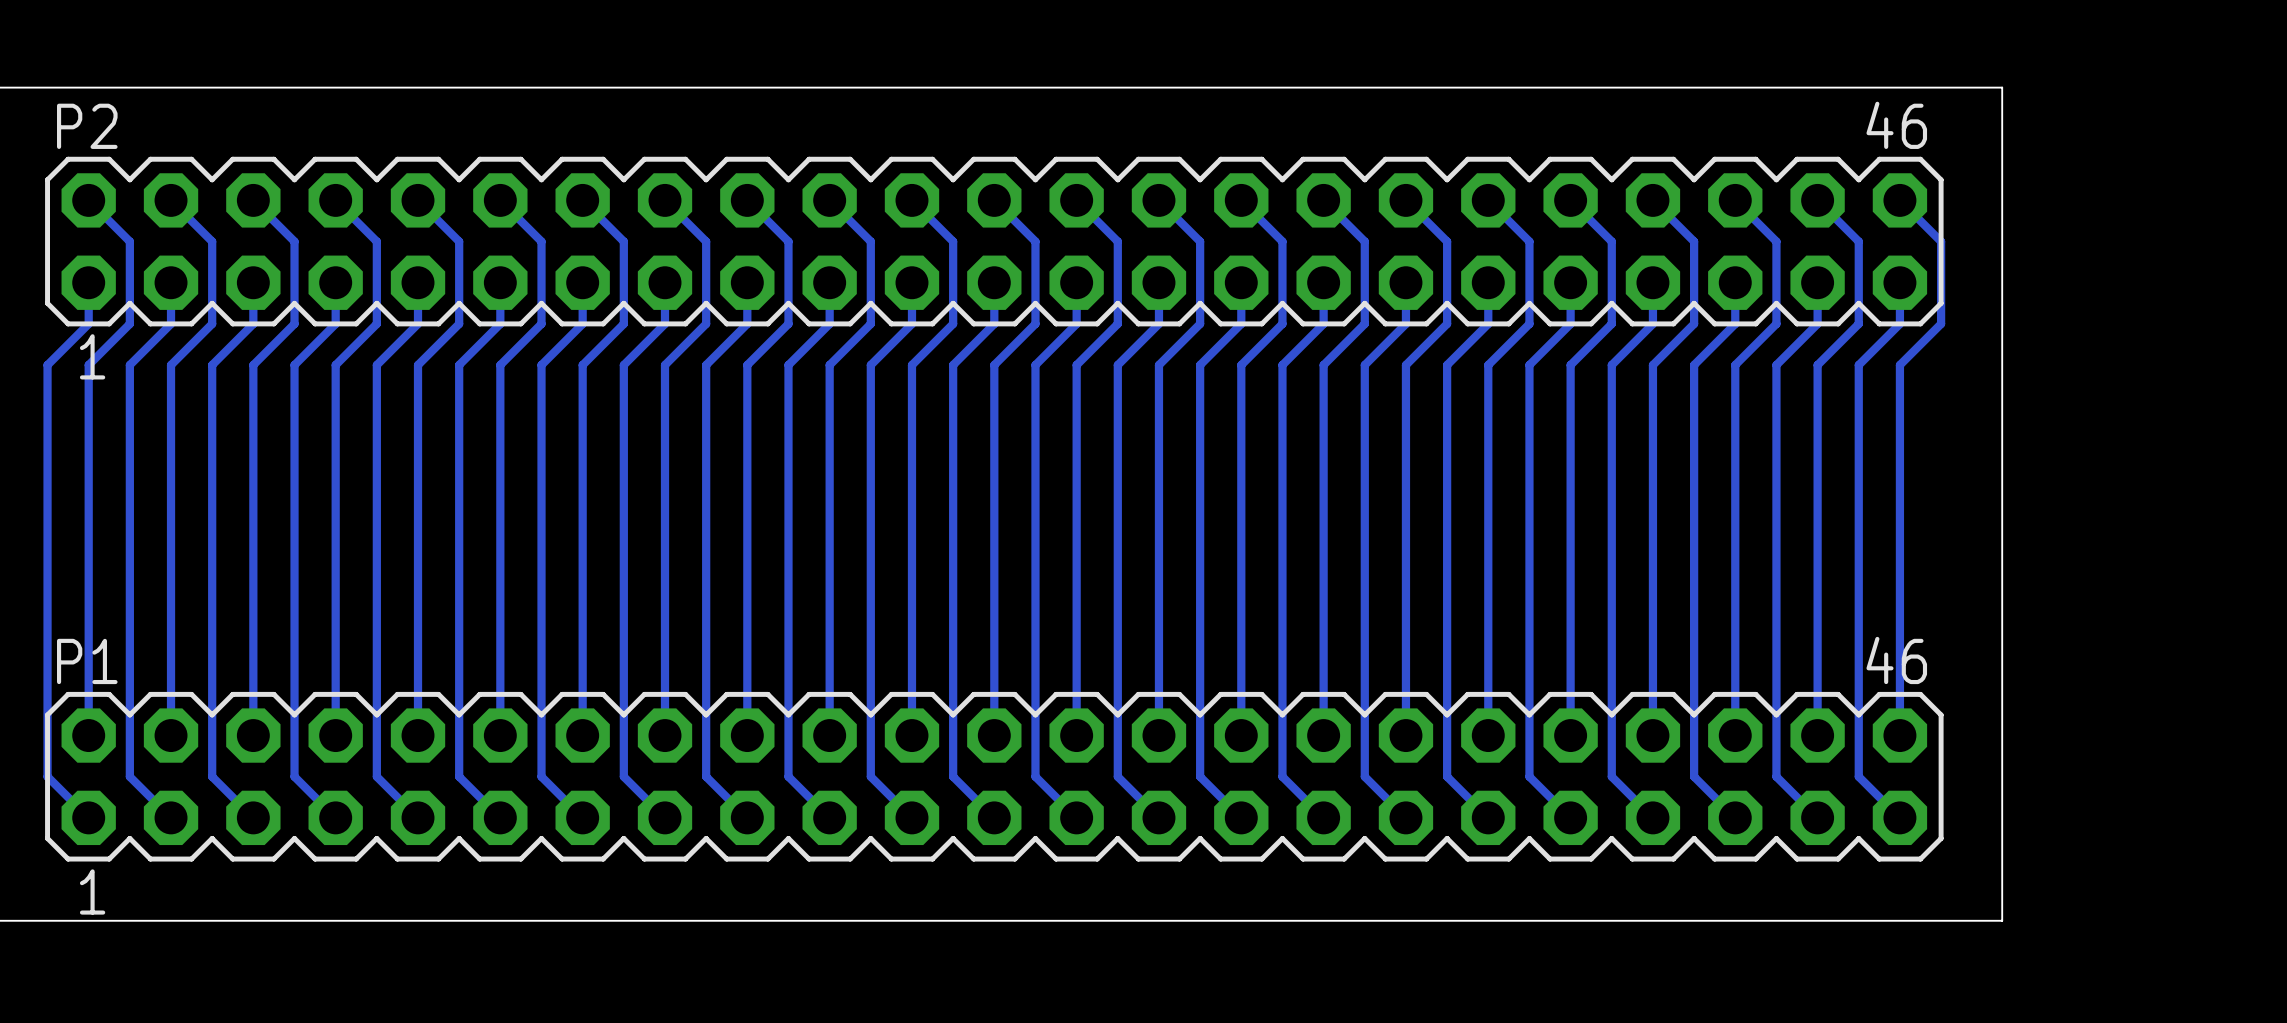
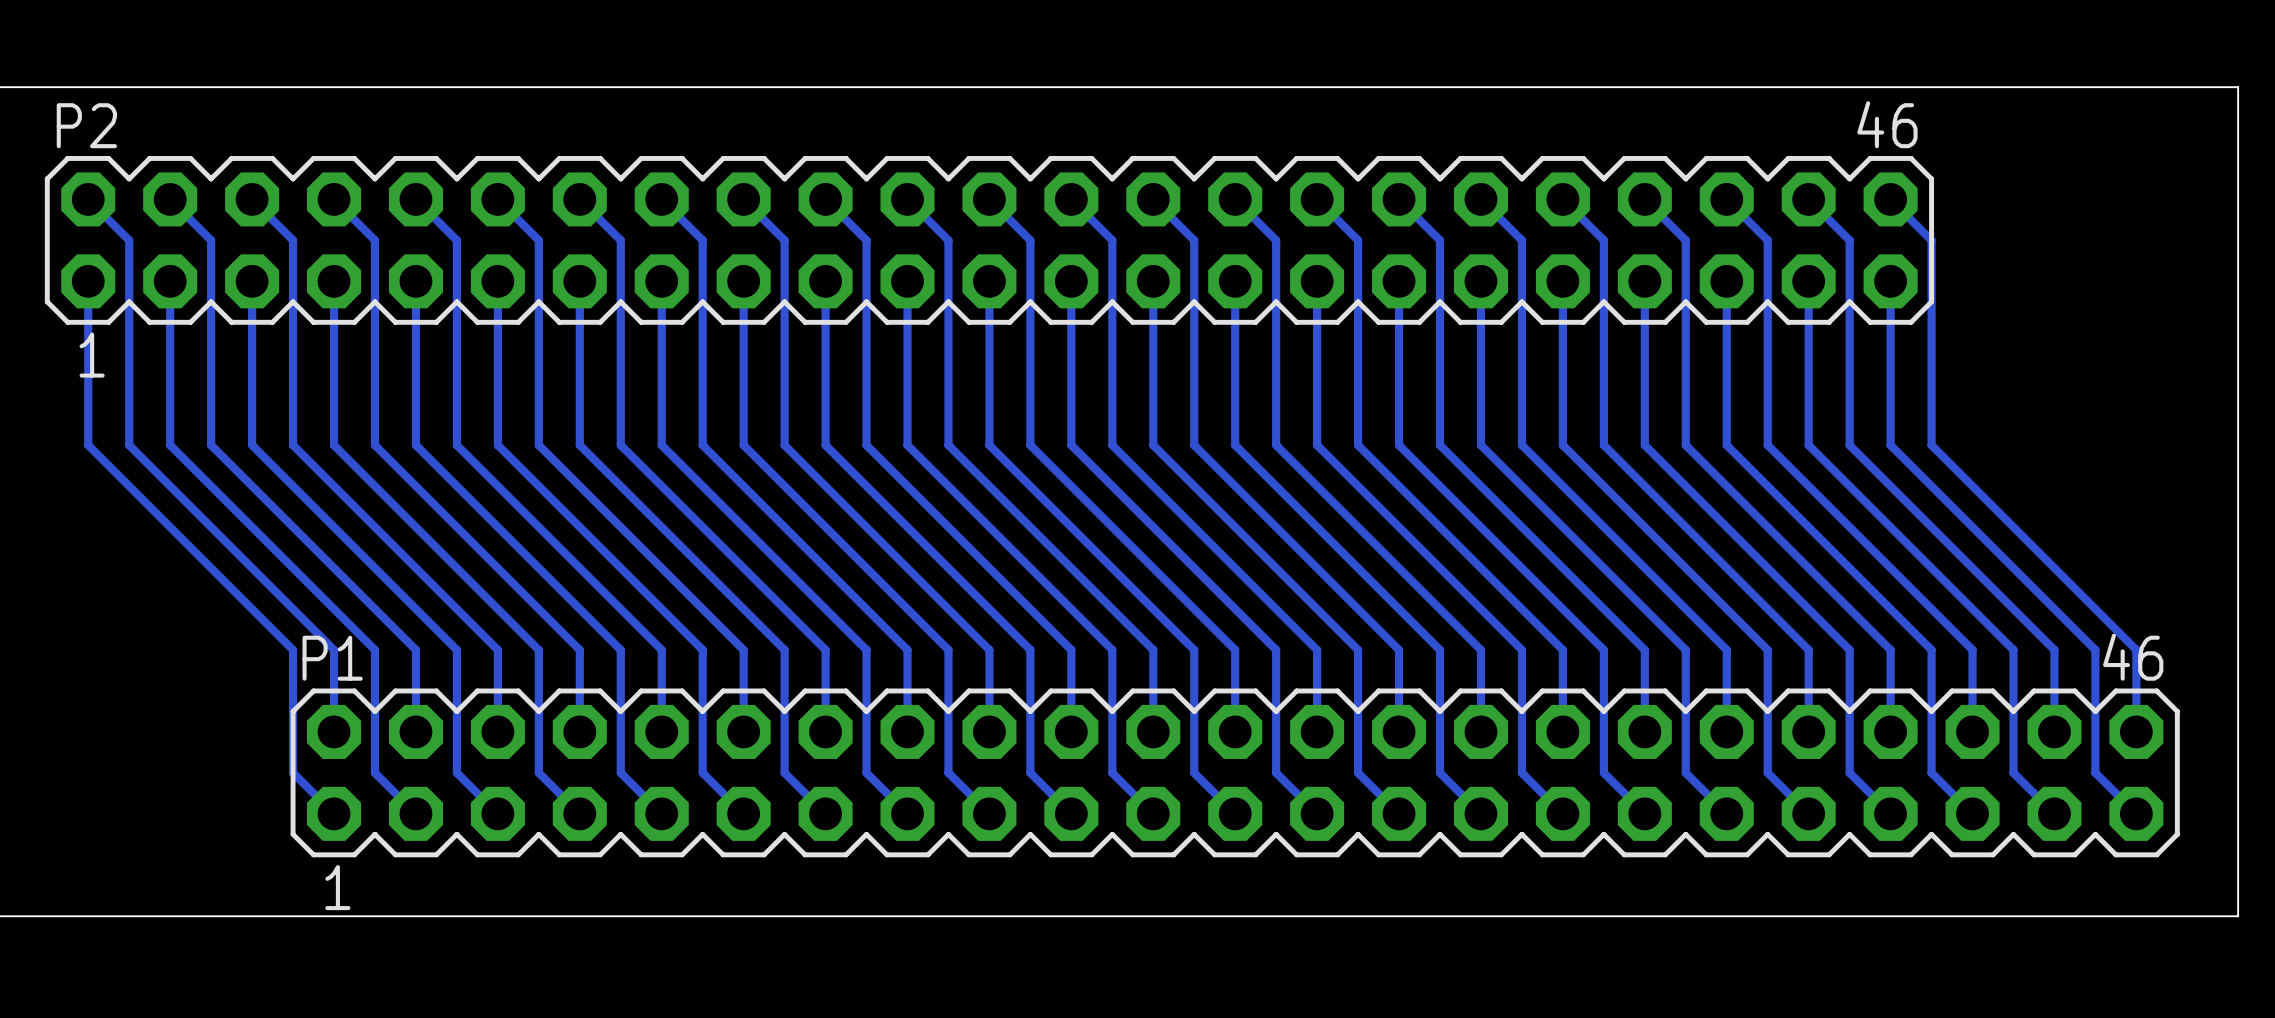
board edge: (2002, 87) (2002, 920) -> (1992, 87) (2238, 87) (2238, 916) (1992, 916)
bottom track: (88, 323) (47, 365) (47, 776) (88, 817) -> none
bottom track: (129, 323) (88, 365) -> (88, 322) (88, 363)
bottom track: (171, 323) (129, 365) -> (129, 322) (129, 363)
bottom track: (212, 323) (171, 365) -> (170, 322) (170, 363)
bottom track: (253, 323) (212, 365) -> (211, 322) (211, 363)
bottom track: (294, 323) (253, 365) -> (252, 322) (252, 363)
bottom track: (335, 323) (294, 365) -> (293, 322) (293, 363)
bottom track: (376, 323) (335, 365) -> (334, 322) (334, 363)
bottom track: (418, 323) (376, 365) -> (375, 322) (375, 363)
bottom track: (459, 323) (418, 365) -> (415, 322) (415, 363)
bottom track: (500, 323) (459, 365) -> (456, 322) (456, 363)
bottom track: (541, 323) (500, 365) -> (497, 322) (497, 363)
bottom track: (582, 323) (541, 365) -> (538, 322) (538, 363)
bottom track: (623, 323) (582, 365) -> (579, 322) (579, 363)
bottom track: (665, 323) (623, 365) -> (620, 322) (620, 363)
bottom track: (706, 323) (665, 365) -> (661, 322) (661, 363)
bottom track: (747, 323) (706, 365) -> (702, 322) (702, 363)
bottom track: (788, 323) (747, 365) -> (743, 322) (743, 363)
bottom track: (829, 323) (788, 365) -> (784, 322) (784, 363)
bottom track: (870, 323) (829, 365) -> (825, 322) (825, 363)
bottom track: (911, 323) (870, 365) -> (866, 322) (866, 363)
bottom track: (953, 323) (911, 365) -> (907, 322) (907, 363)
bottom track: (994, 323) (953, 365) -> (948, 322) (948, 363)
bottom track: (1035, 323) (994, 365) -> (989, 322) (989, 363)
bottom track: (1076, 323) (1035, 365) -> (1030, 322) (1030, 363)
bottom track: (1117, 323) (1076, 365) -> (1071, 322) (1071, 363)
bottom track: (1158, 323) (1117, 365) -> (1112, 322) (1112, 363)
bottom track: (1200, 323) (1158, 365) -> (1153, 322) (1153, 363)
bottom track: (1241, 323) (1200, 365) -> (1194, 322) (1194, 363)
bottom track: (1282, 323) (1241, 365) -> (1235, 322) (1235, 363)
bottom track: (1323, 323) (1282, 365) -> (1276, 322) (1276, 363)
bottom track: (1364, 323) (1323, 365) -> (1317, 322) (1317, 363)
bottom track: (1405, 323) (1364, 365) -> (1358, 322) (1358, 363)
bottom track: (1447, 323) (1405, 365) -> (1399, 322) (1399, 363)
bottom track: (1488, 323) (1447, 365) -> (1440, 322) (1440, 363)
bottom track: (1529, 323) (1488, 365) -> (1480, 322) (1480, 363)
bottom track: (1570, 323) (1529, 365) -> (1521, 322) (1521, 363)
bottom track: (1611, 323) (1570, 365) -> (1562, 322) (1562, 363)
bottom track: (1652, 323) (1611, 365) -> (1603, 322) (1603, 363)
bottom track: (1694, 323) (1652, 365) -> (1644, 322) (1644, 363)
bottom track: (1735, 323) (1694, 365) -> (1685, 322) (1685, 363)
bottom track: (1776, 323) (1735, 365) -> (1726, 322) (1726, 363)
bottom track: (1817, 323) (1776, 365) -> (1767, 322) (1767, 363)
bottom track: (1858, 323) (1817, 365) -> (1808, 322) (1808, 363)
bottom track: (1899, 323) (1858, 365) -> (1849, 322) (1849, 363)
bottom track: (1941, 323) (1899, 365) -> (1890, 322) (1890, 363)
bottom track: none -> (1931, 322) (1931, 445) (2136, 650) (2136, 731)
bottom track: (88, 447) (88, 735) -> (88, 445) (293, 650)
bottom track: (129, 447) (129, 776) (171, 817) -> (129, 445) (334, 650) (334, 731)
bottom track: (171, 447) (171, 735) -> none
bottom track: (212, 447) (212, 776) (253, 817) -> (211, 445) (415, 650)
bottom track: (253, 447) (253, 735) -> (252, 445) (456, 650)
bottom track: (294, 447) (294, 653) -> (293, 445) (497, 650)
bottom track: (335, 447) (335, 735) -> none
bottom track: (376, 447) (376, 776) -> (170, 445) (375, 650) (375, 772)
bottom track: (418, 447) (418, 653) -> (415, 445) (620, 650)
bottom track: (459, 447) (459, 653) -> (456, 445) (661, 650)
bottom track: (500, 447) (500, 653) -> (497, 445) (702, 650)
bottom track: (541, 447) (541, 653) -> (334, 445) (538, 650)
bottom track: none -> (538, 445) (743, 650)
bottom track: (582, 447) (582, 653) -> (375, 445) (579, 650)
bottom track: none -> (579, 445) (784, 650)
bottom track: (623, 447) (623, 653) -> (620, 445) (825, 650)
bottom track: (665, 447) (665, 653) -> (661, 445) (866, 650)
bottom track: (706, 447) (706, 653) -> (702, 445) (907, 650)
bottom track: (747, 447) (747, 653) -> (743, 445) (948, 650)
bottom track: (788, 447) (788, 653) -> (784, 445) (989, 650)
bottom track: (829, 447) (829, 653) -> (825, 445) (1030, 650)
bottom track: (870, 447) (870, 653) -> (866, 445) (1071, 650)
bottom track: (911, 447) (911, 653) -> (907, 445) (1112, 650)
bottom track: (953, 447) (953, 653) -> (948, 445) (1153, 650)
bottom track: (994, 447) (994, 653) -> (989, 445) (1194, 650)
bottom track: (1035, 447) (1035, 653) -> (1030, 445) (1235, 650)
bottom track: (1076, 447) (1076, 653) -> (1071, 445) (1276, 650)
bottom track: (1117, 447) (1117, 653) -> (1112, 445) (1317, 650)
bottom track: (1158, 447) (1158, 653) -> (1153, 445) (1358, 650)
bottom track: (1200, 447) (1200, 653) -> (1194, 445) (1399, 650)
bottom track: (1241, 447) (1241, 653) -> (1235, 445) (1440, 650)
bottom track: (1282, 447) (1282, 653) -> (1276, 445) (1480, 650)
bottom track: (1323, 447) (1323, 653) -> (1317, 445) (1521, 650)
bottom track: (1364, 447) (1364, 653) -> (1358, 445) (1562, 650)
bottom track: (1405, 447) (1405, 653) -> (1399, 445) (1603, 650)
bottom track: (1447, 447) (1447, 653) -> (1440, 445) (1644, 650)
bottom track: (1488, 447) (1488, 653) -> (1480, 445) (1685, 650)
bottom track: (1529, 447) (1529, 653) -> (1521, 445) (1726, 650)
bottom track: (1570, 447) (1570, 653) -> (1562, 445) (1767, 650)
bottom track: (1611, 447) (1611, 653) -> (1603, 445) (1808, 650)
bottom track: (1652, 447) (1652, 653) -> (1644, 445) (1849, 650)
bottom track: (1694, 447) (1694, 653) -> (1685, 445) (1890, 650)
bottom track: (1735, 447) (1735, 653) -> (1726, 445) (1931, 650) (1931, 772) (1972, 813)
bottom track: (1776, 447) (1776, 653) -> (1767, 445) (1972, 650) (1972, 731)
bottom track: (1817, 447) (1817, 653) -> (1808, 445) (2013, 650) (2013, 772) (2054, 813)
bottom track: (1858, 447) (1858, 653) -> (1849, 445) (2054, 650) (2054, 731)
bottom track: (1899, 447) (1899, 653) -> (1890, 445) (2095, 650) (2095, 772) (2136, 813)
P1 position: (994, 776) -> (1235, 772)

